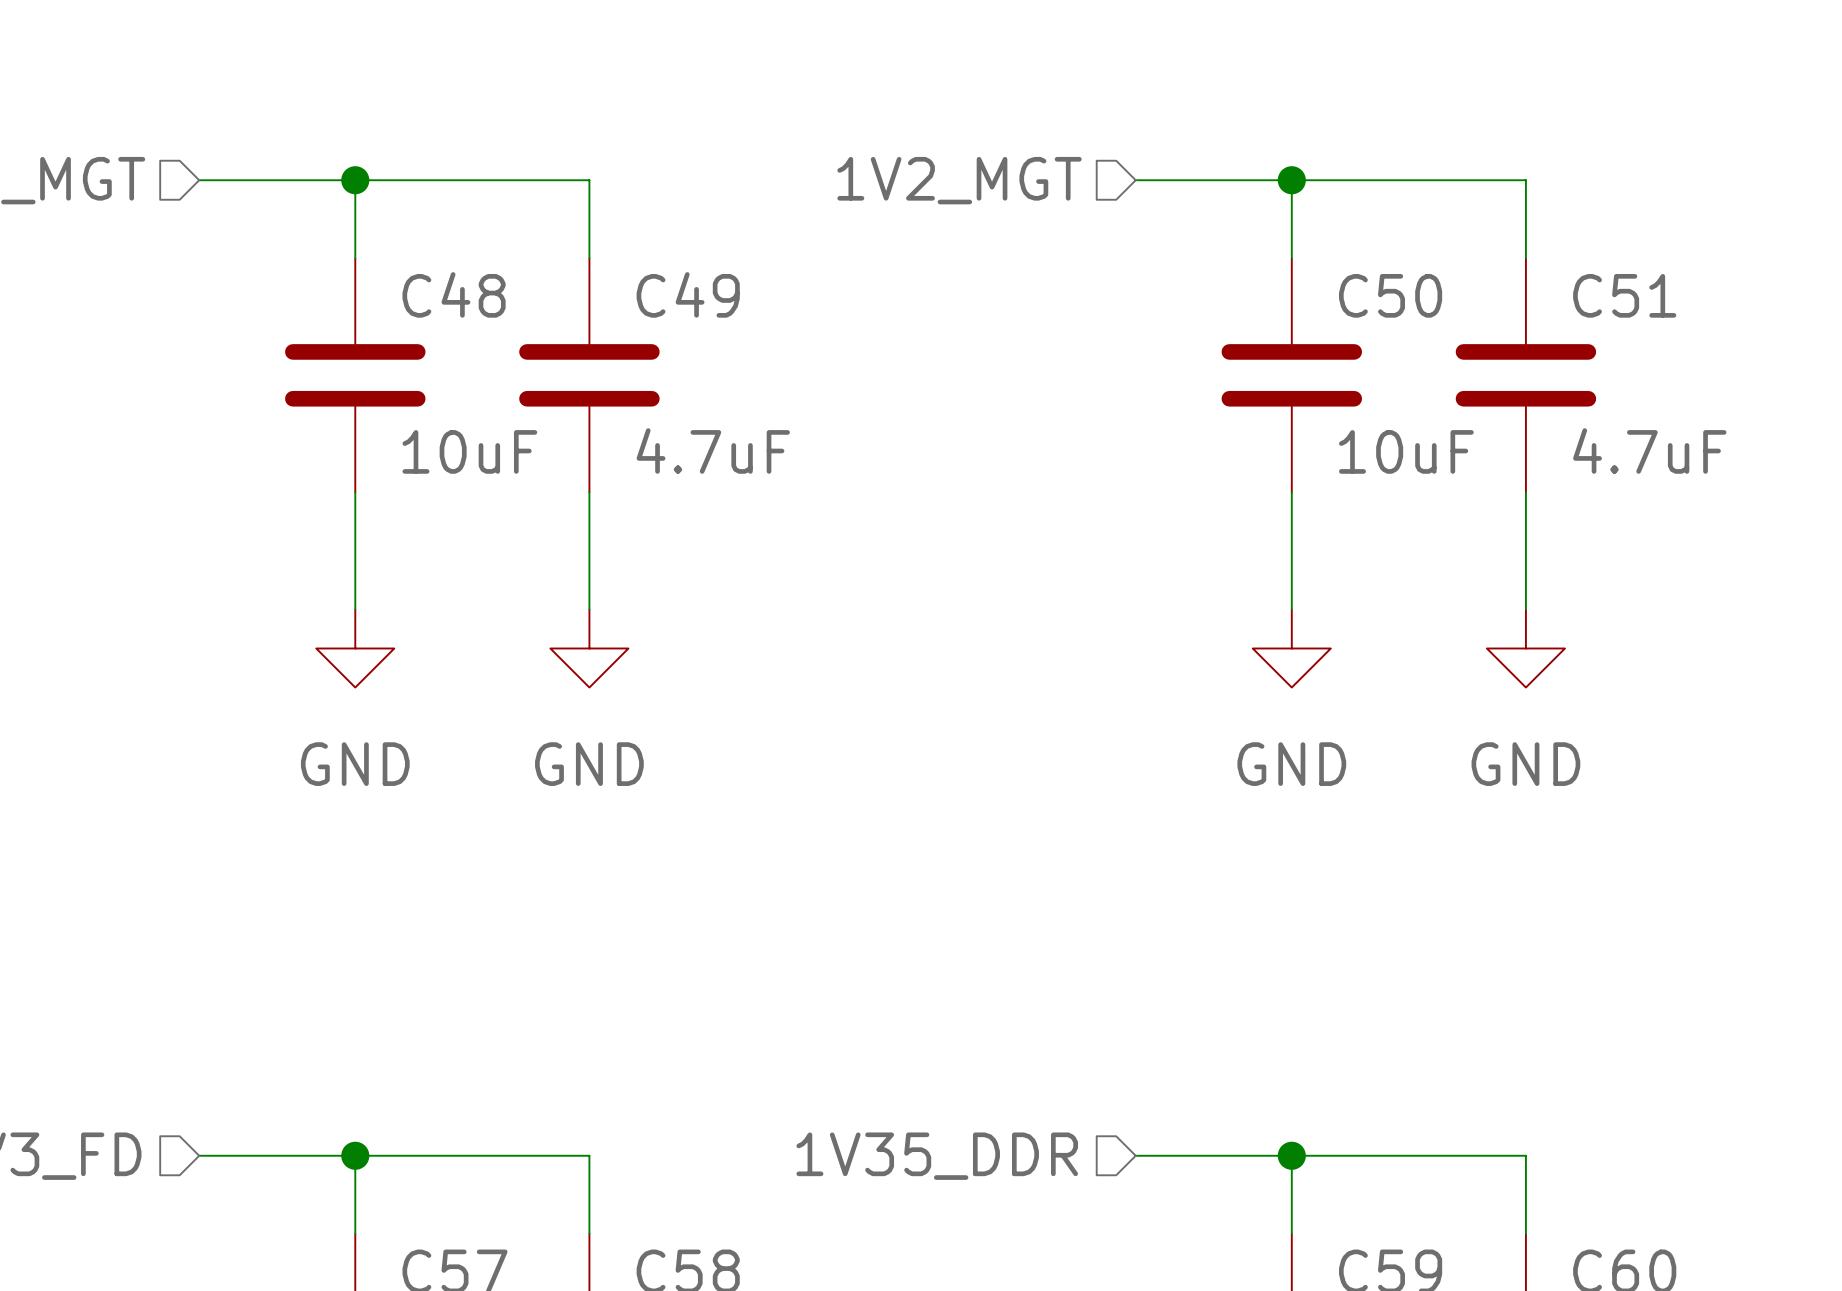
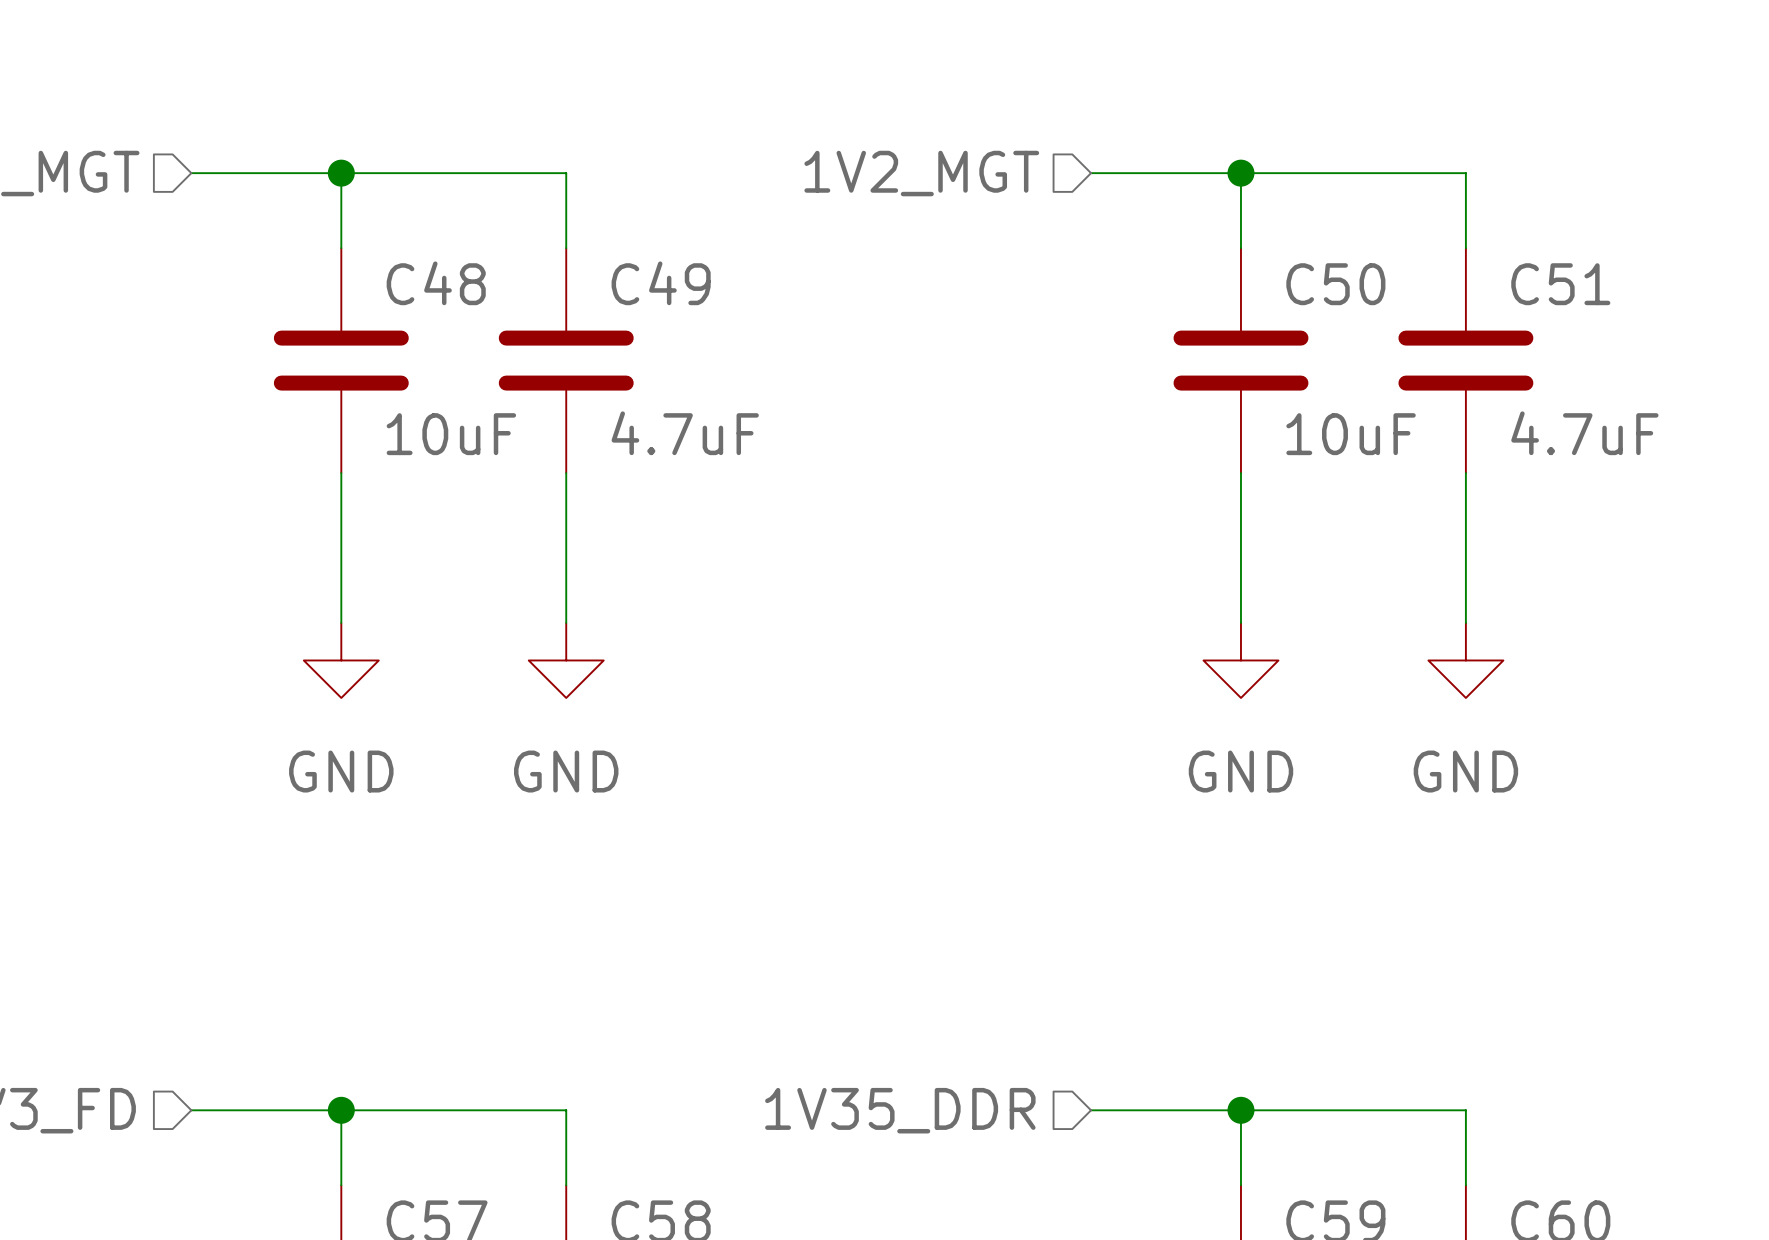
power symbol position: GND (355, 648) -> GND (341, 660)
power symbol position: GND (589, 648) -> GND (566, 660)
power symbol position: GND (1291, 648) -> GND (1240, 660)
power symbol position: GND (1525, 648) -> GND (1465, 660)

